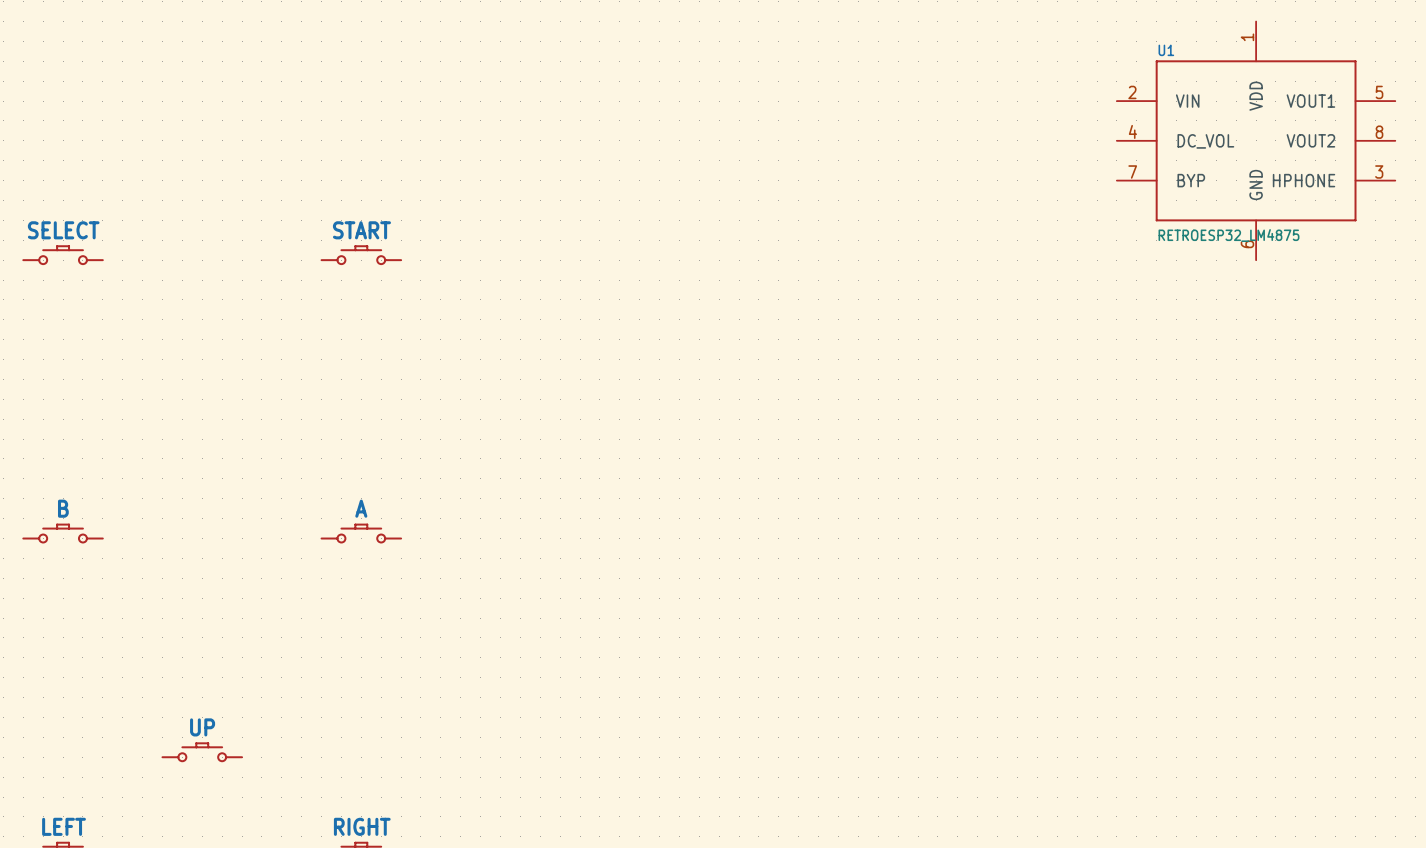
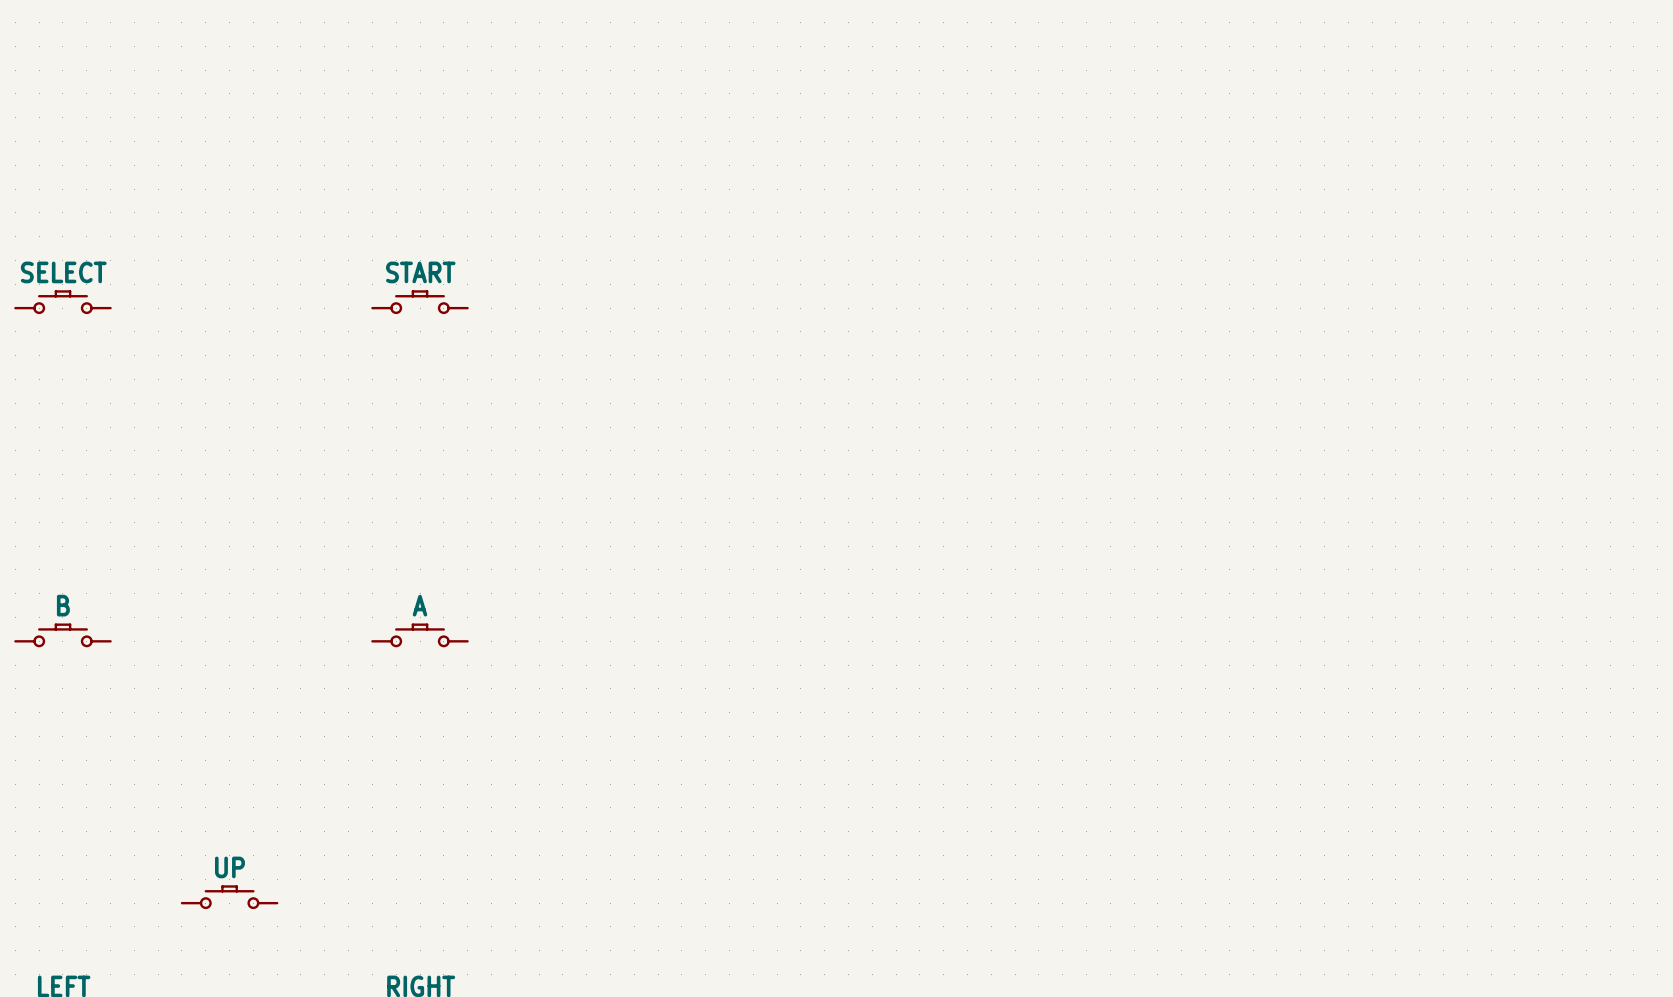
U1: RETROESP32_LM4875 (1256, 140) -> none

